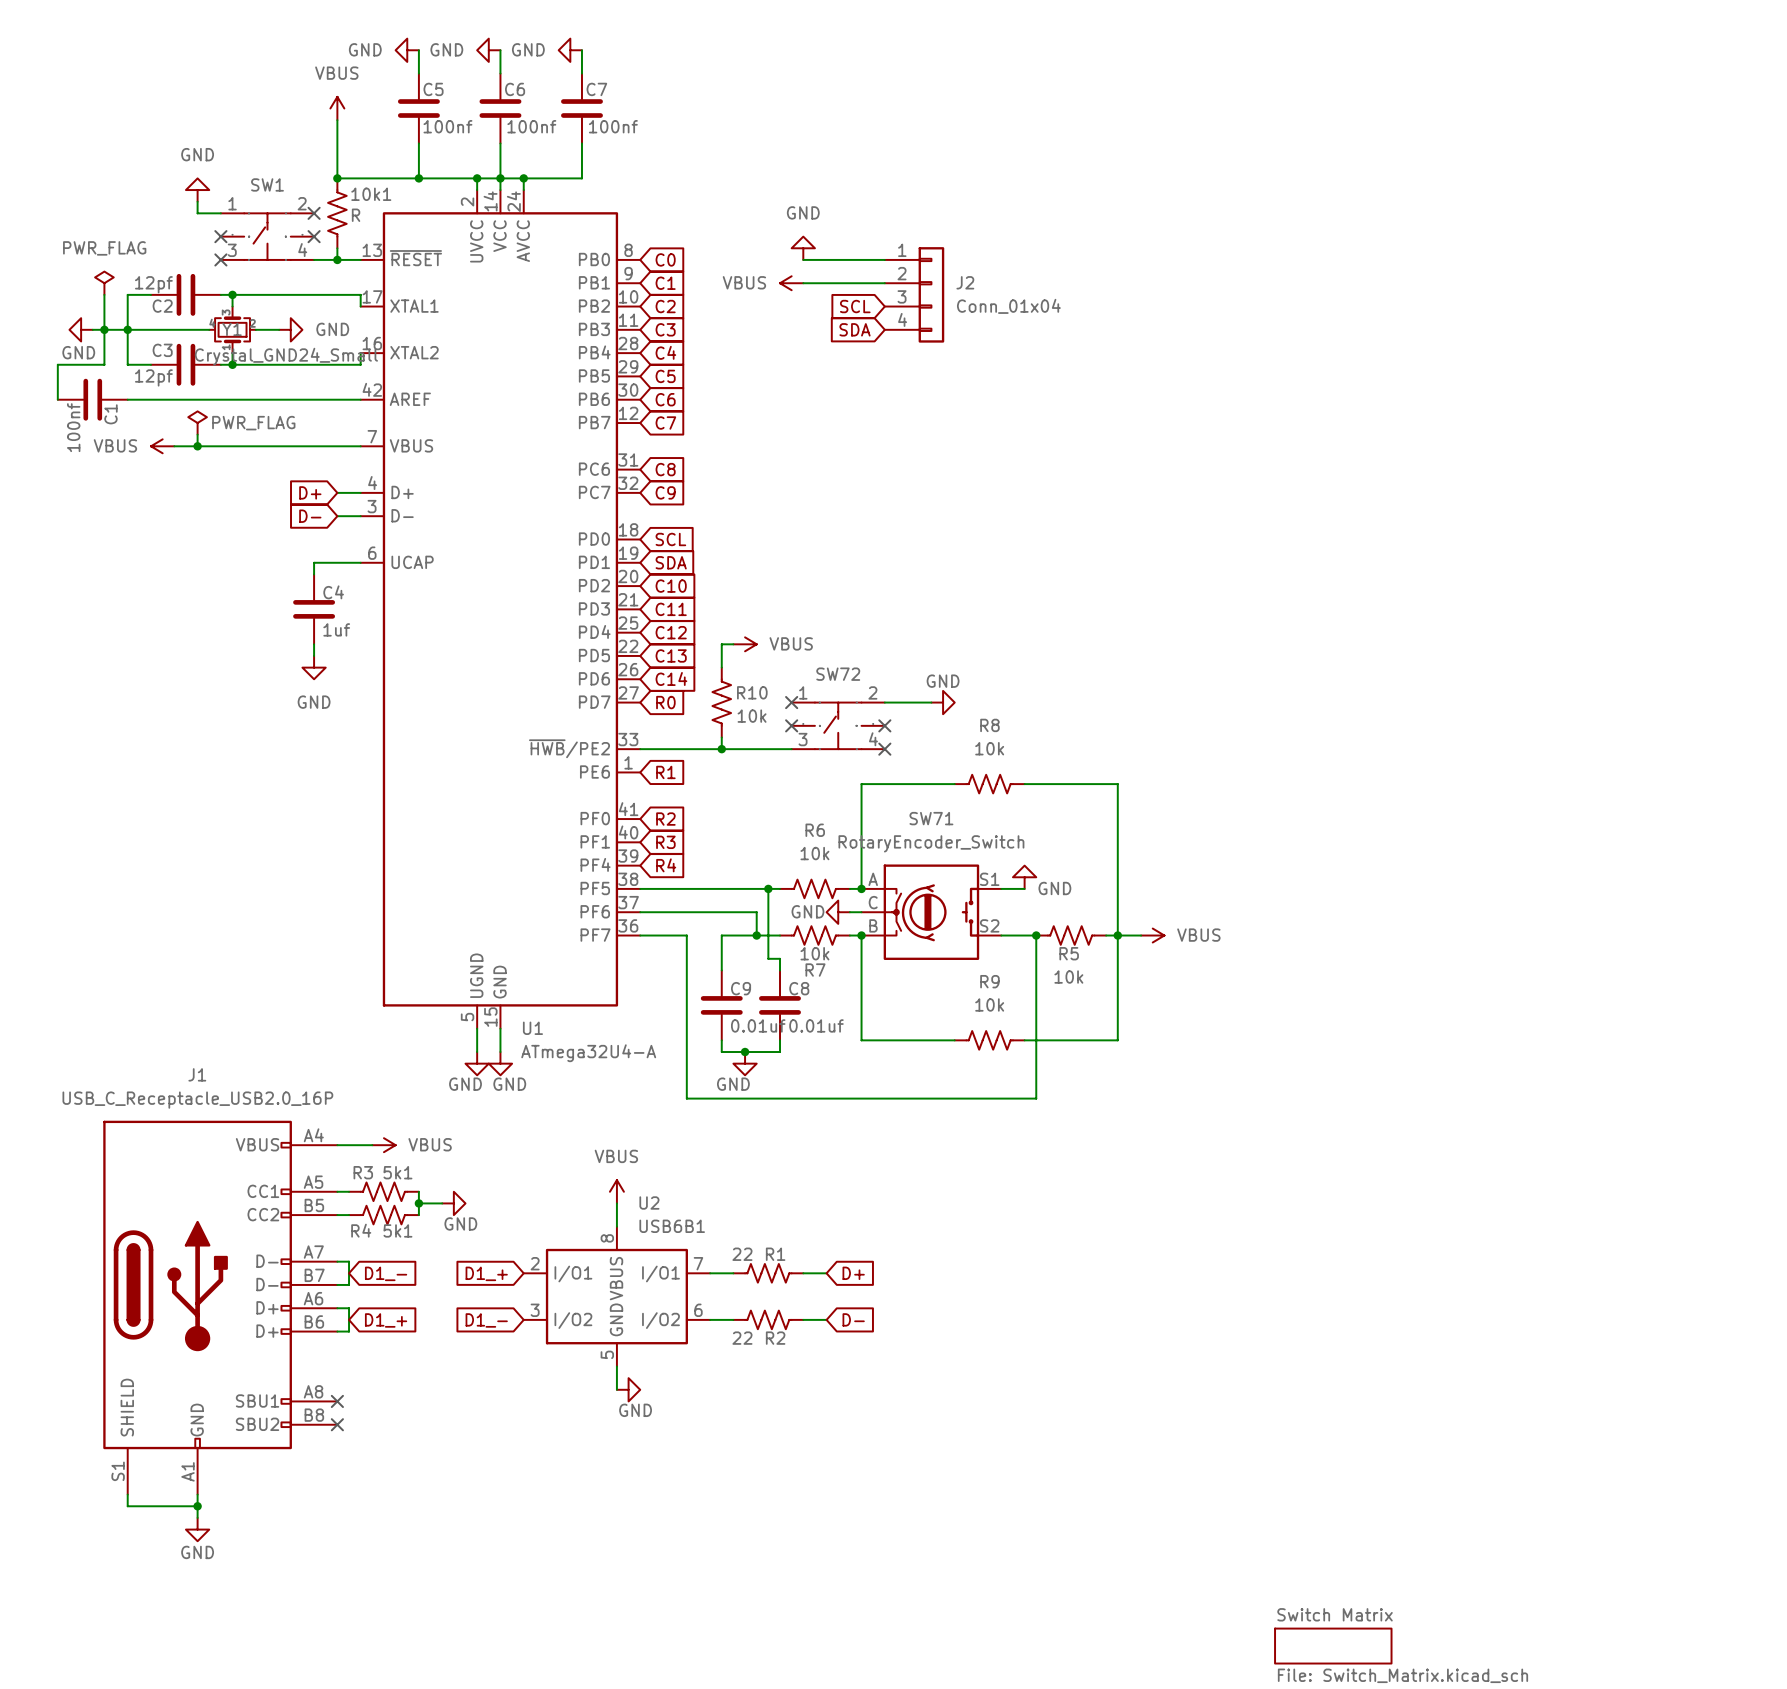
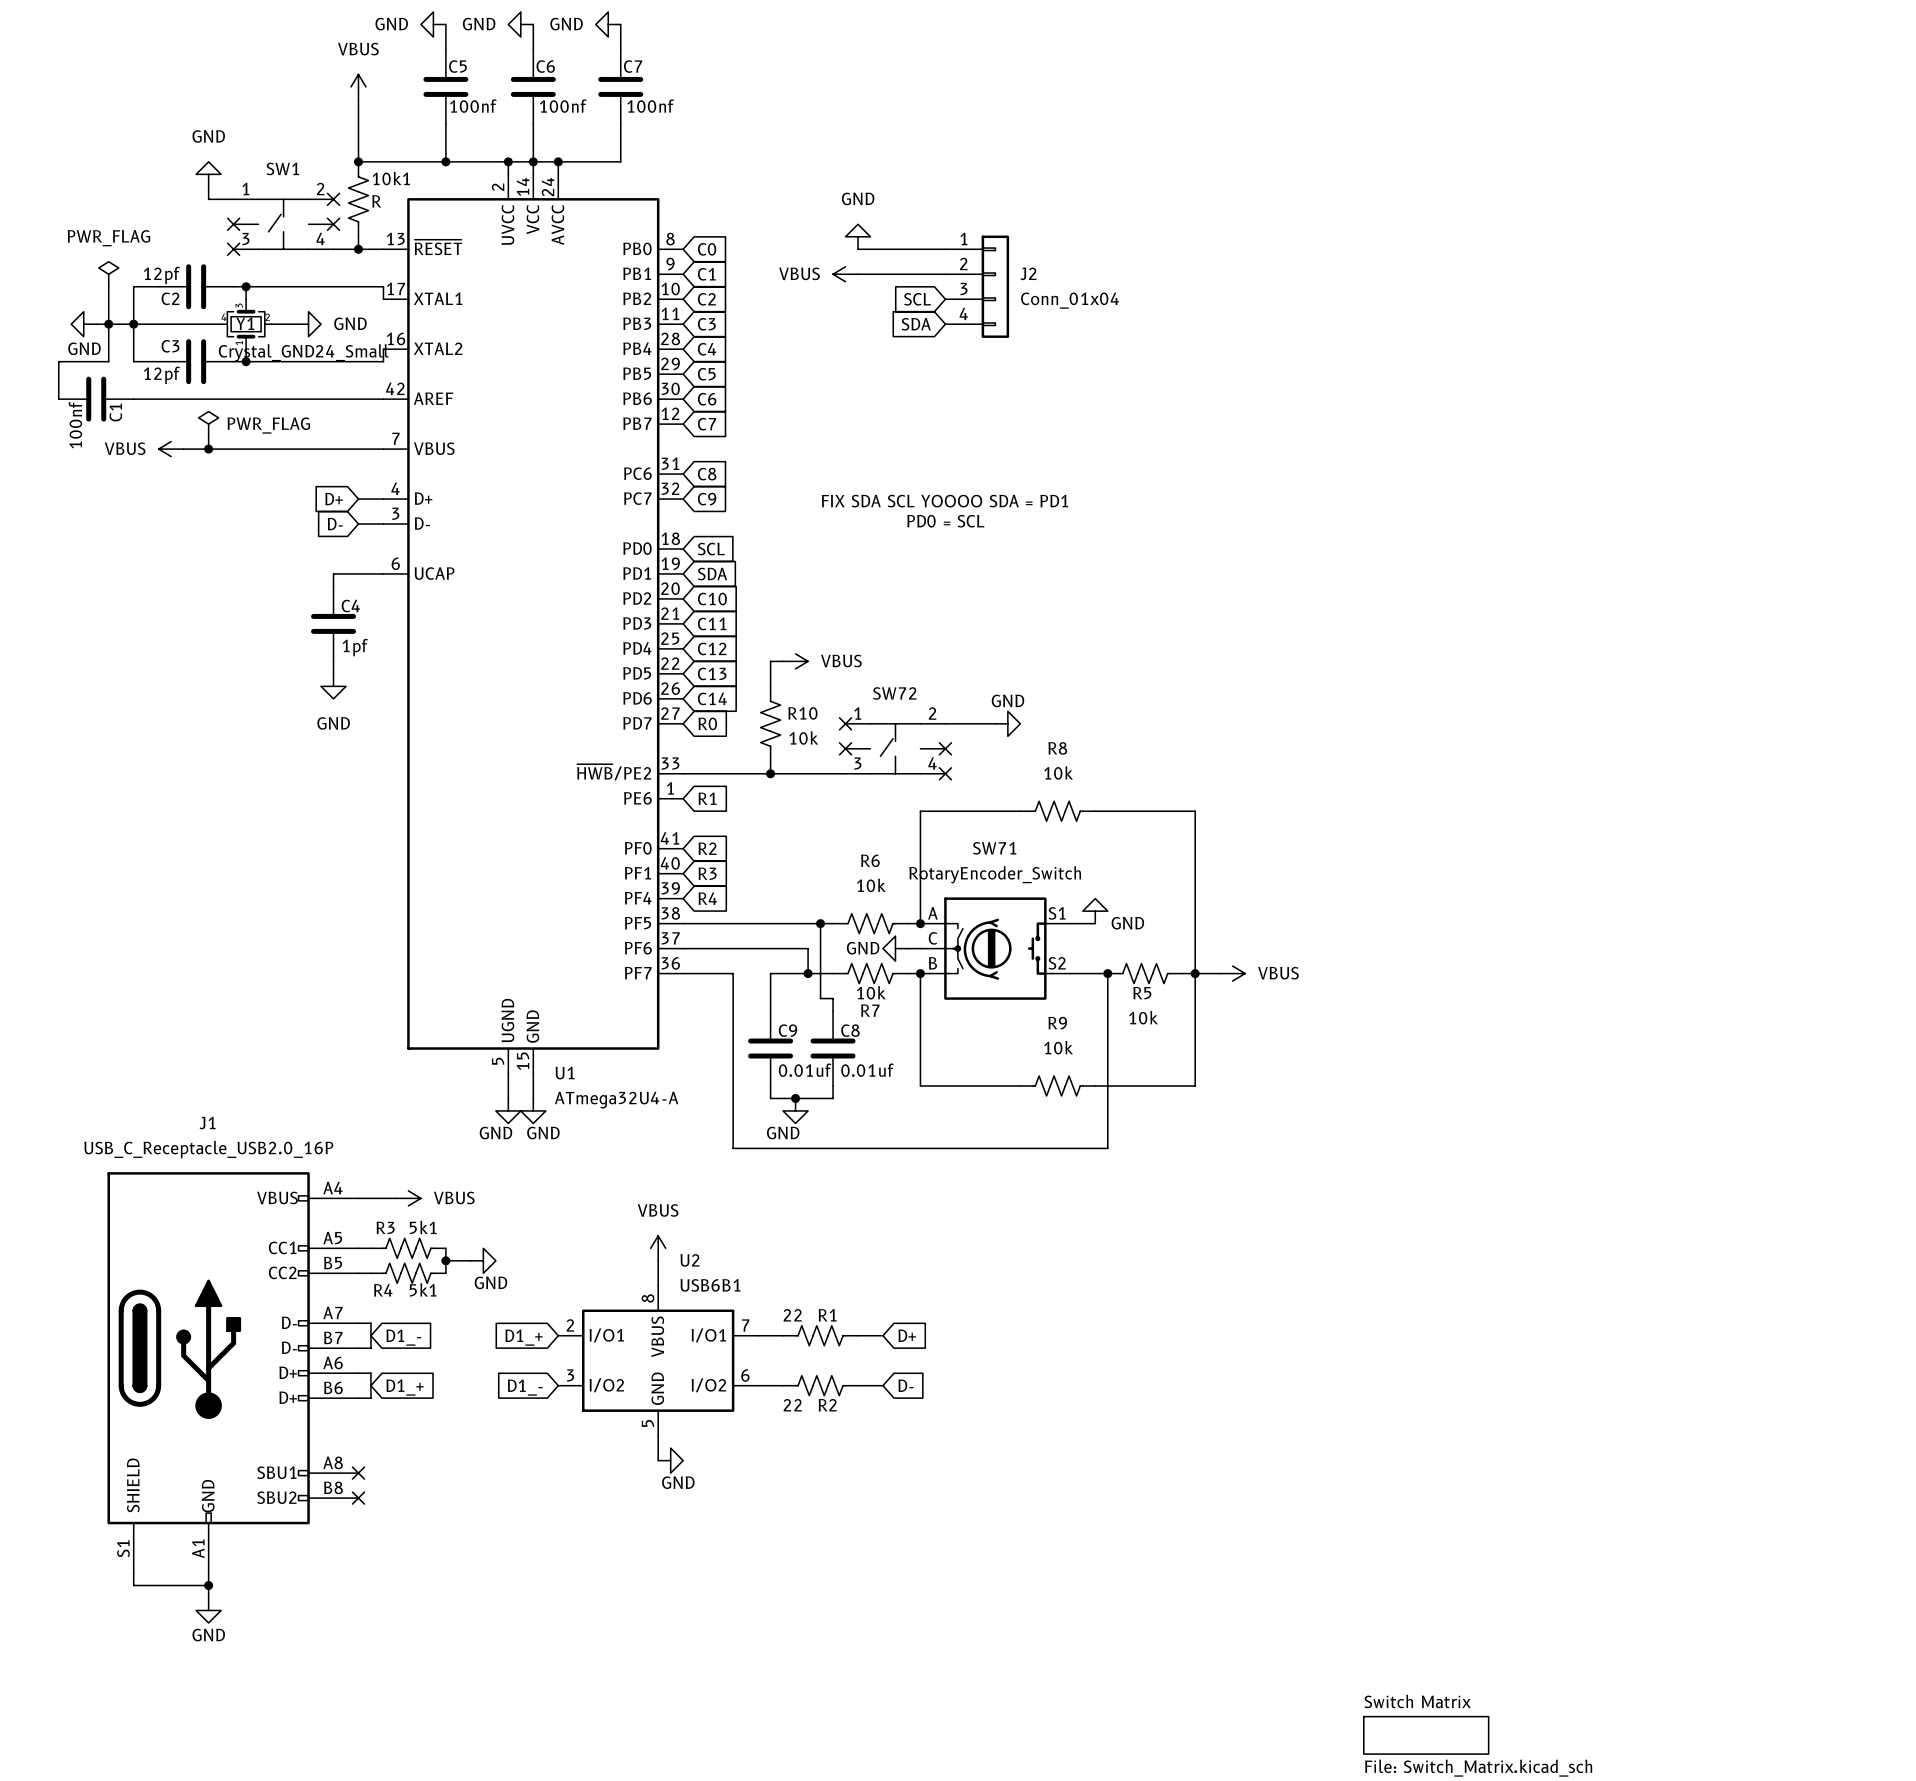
text: none -> FIX SDA SCL YOOOO SDA = PD1 (945, 501)
text: none -> PD0 = SCL (945, 521)
C4 value: 1uf (336, 629) -> 1pf (355, 647)

